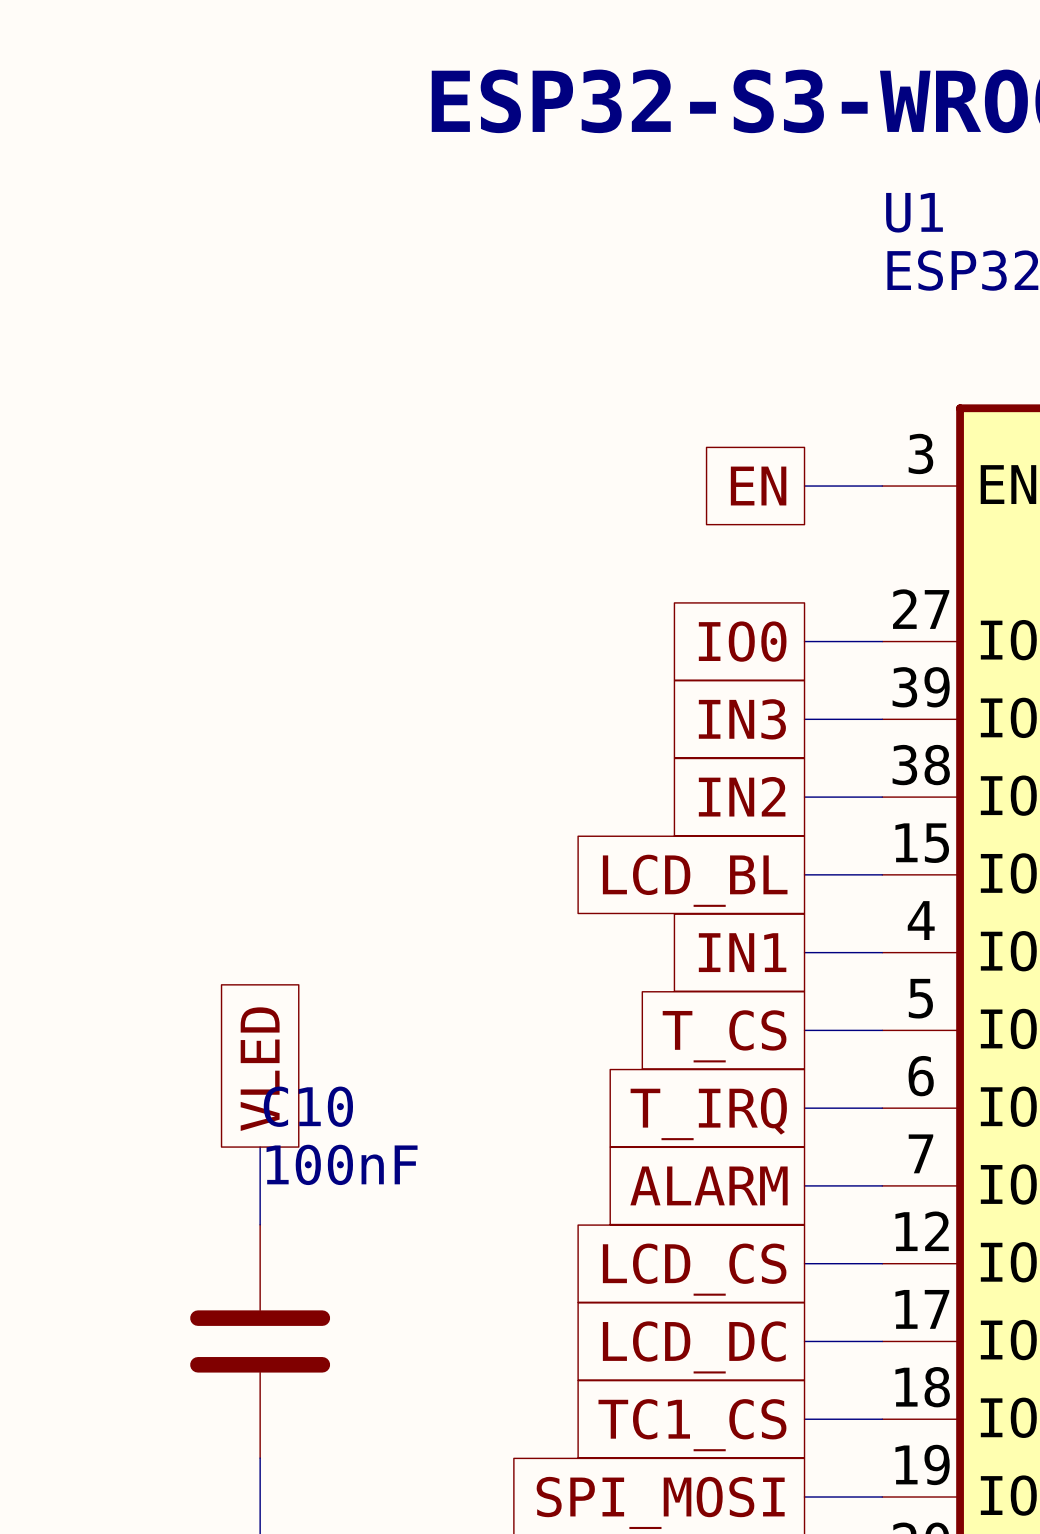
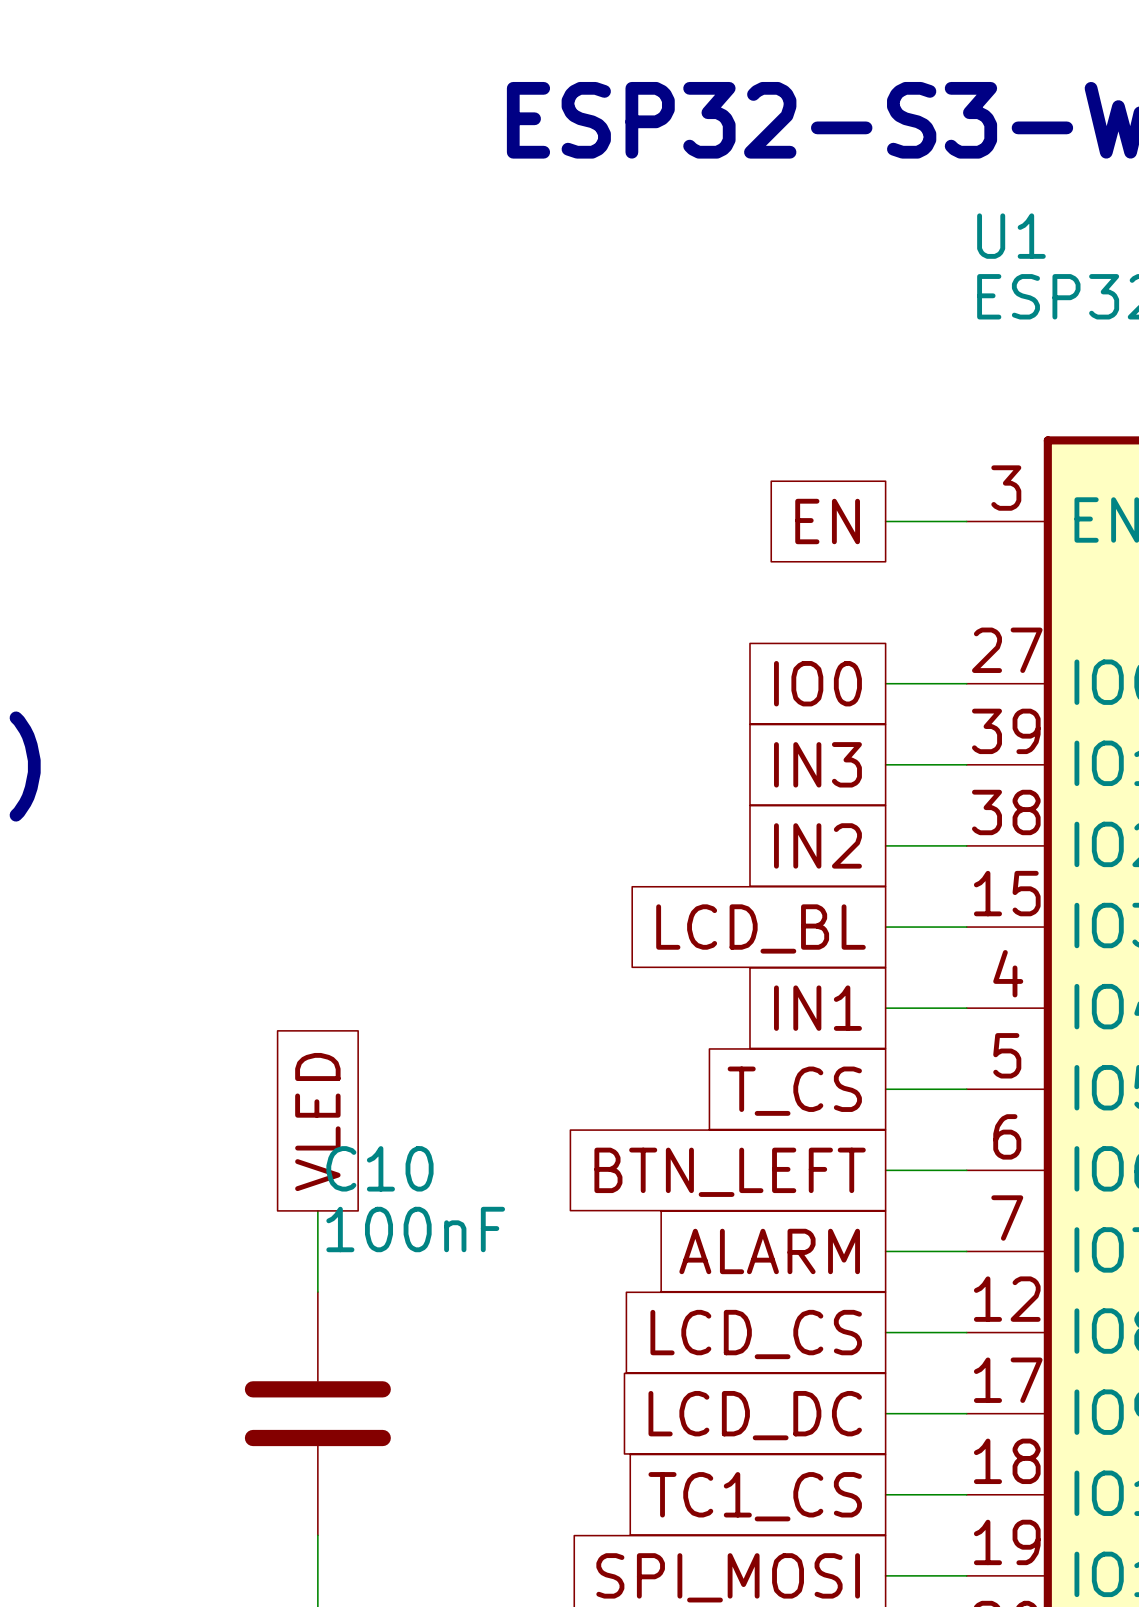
global label: T_IRQ (708, 1114) -> BTN_LEFT (730, 1172)

